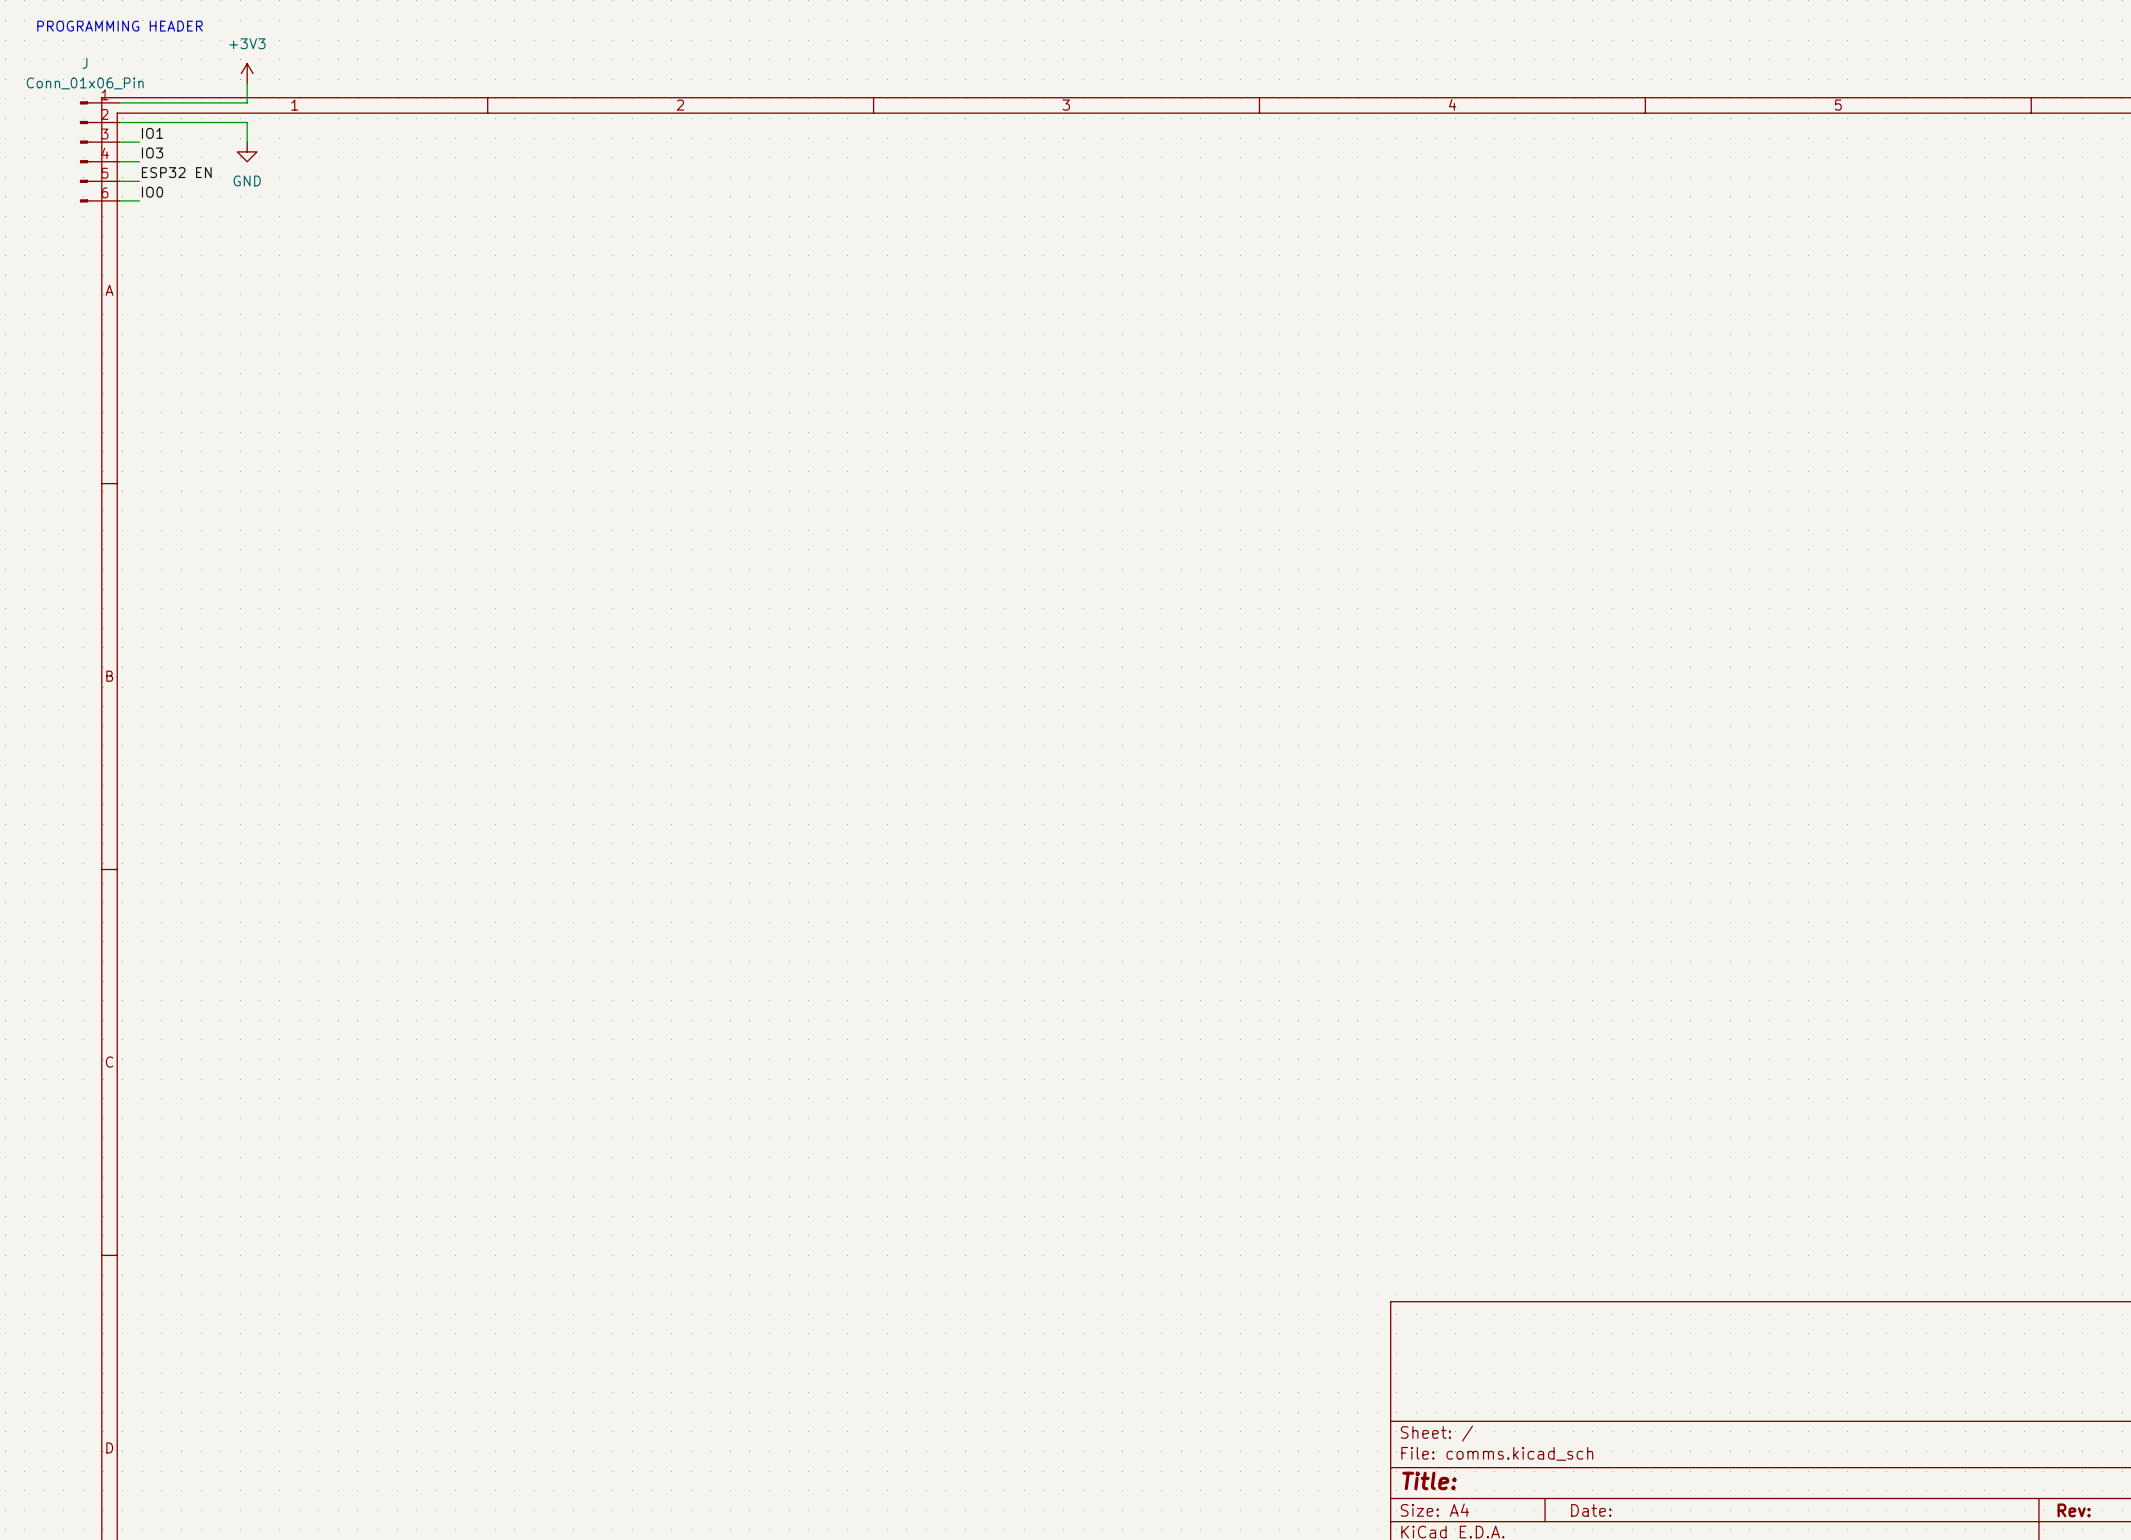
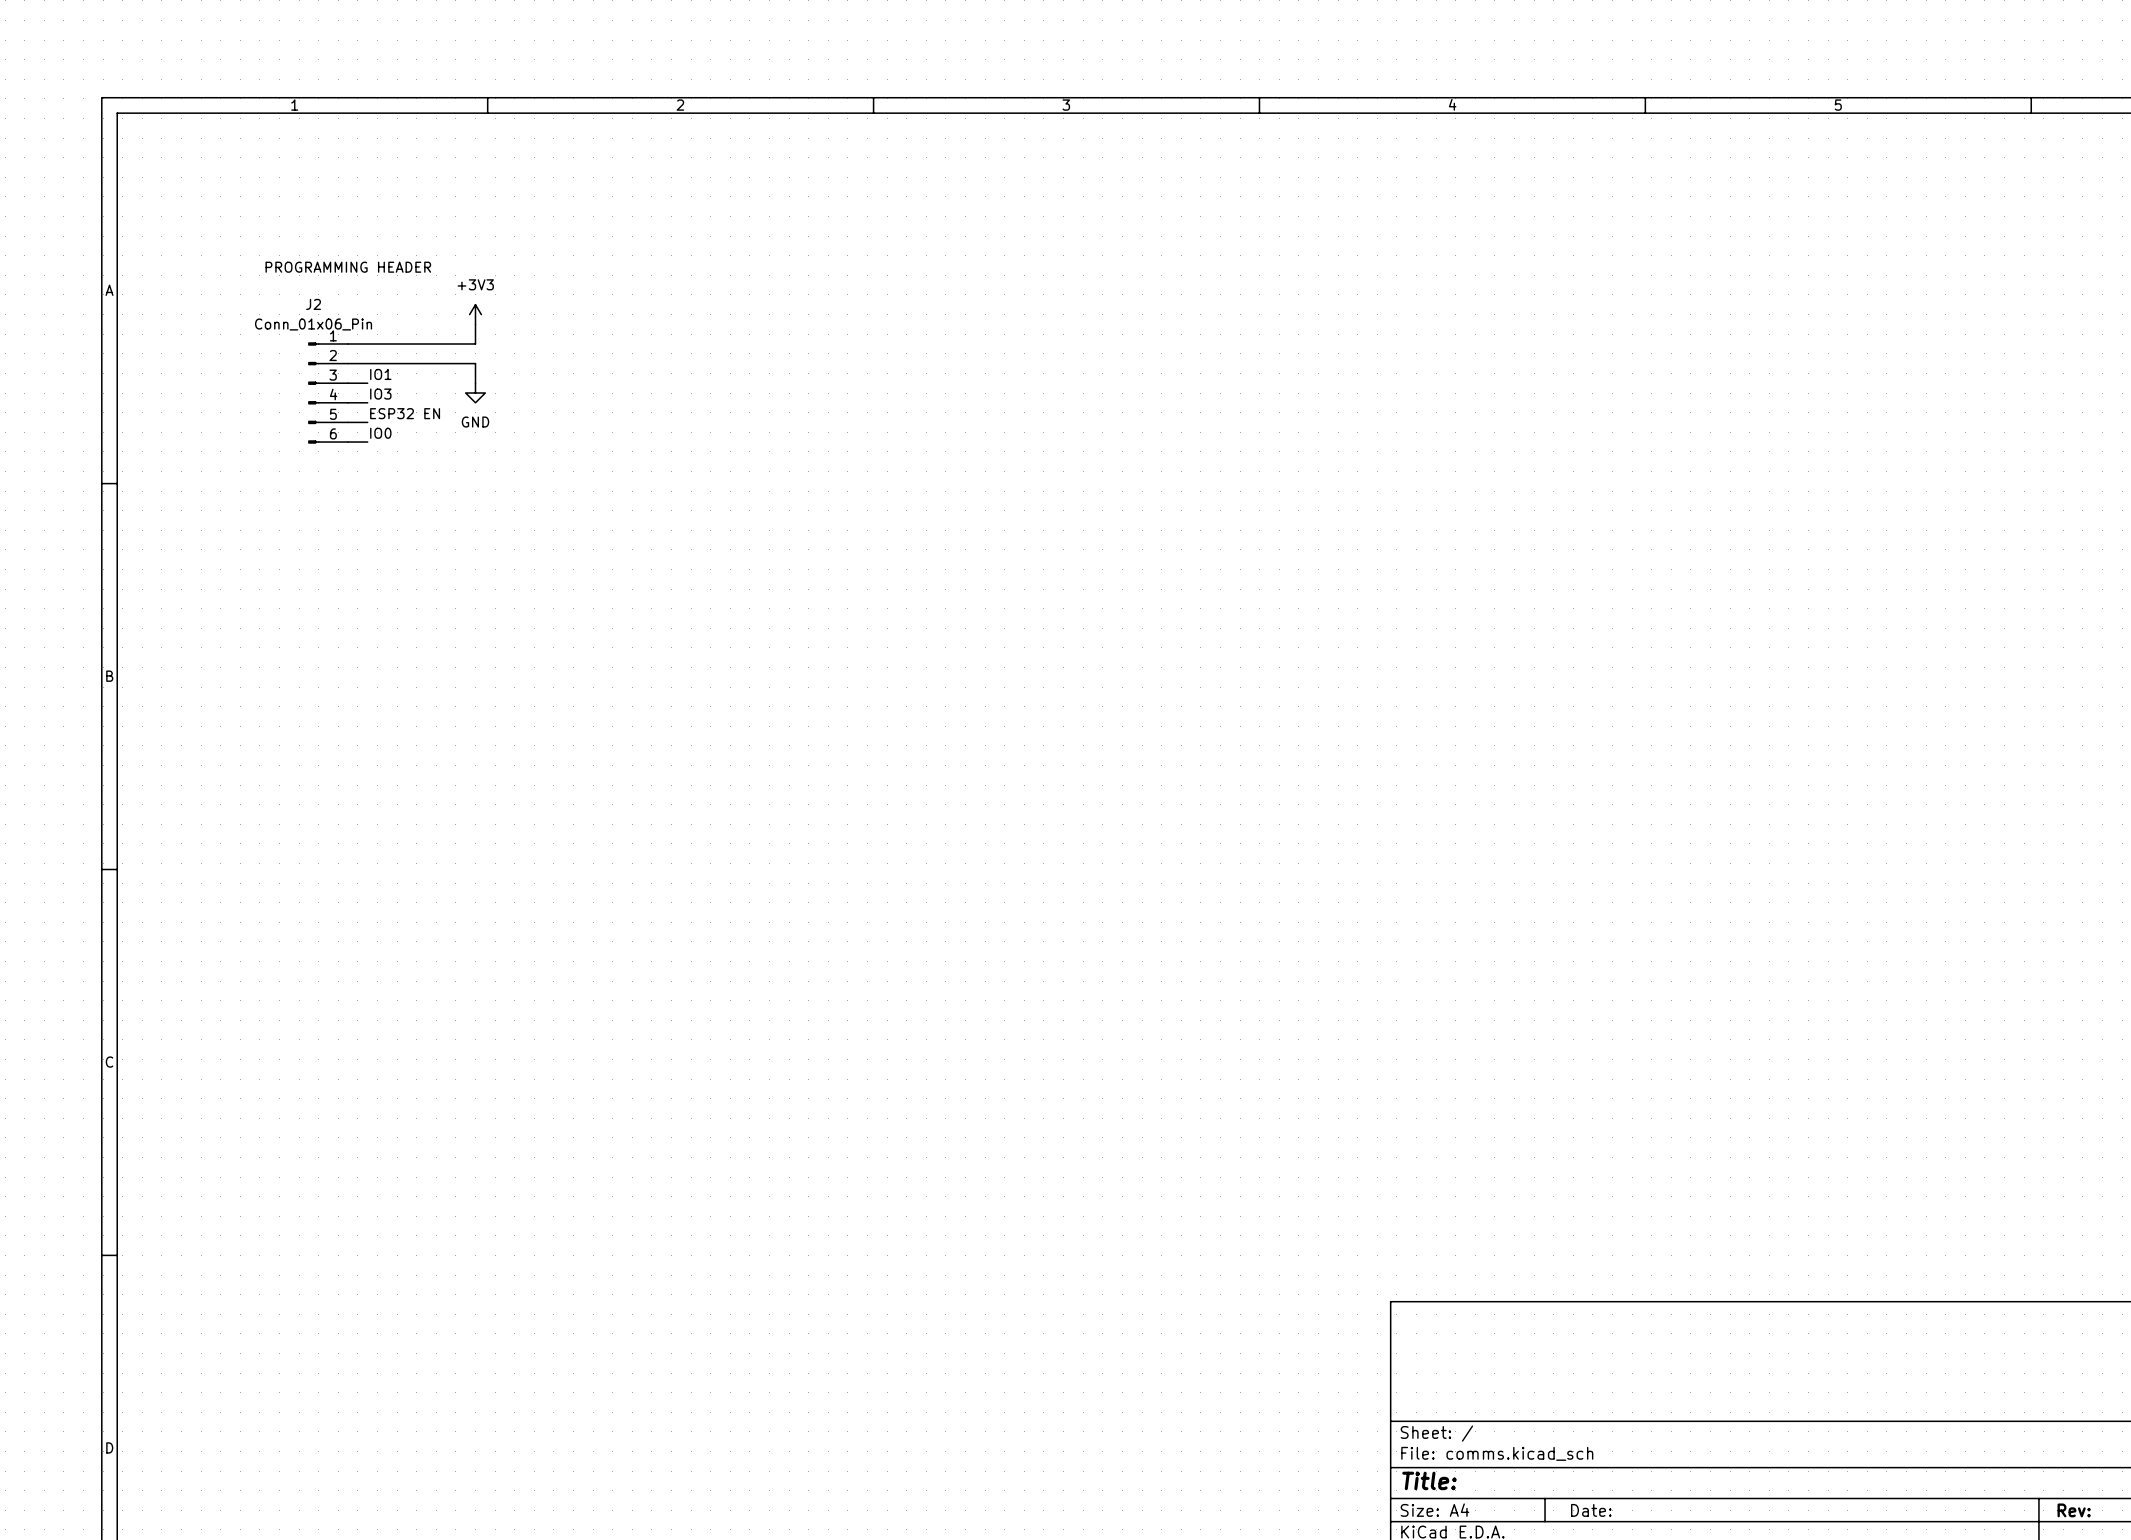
text: PROGRAMMING HEADER (119, 26) -> none
power symbol: +3V3 (247, 73) -> none
wire: (247, 83) (247, 102) (119, 102) -> none
wire: (119, 122) (247, 122) (247, 142) -> none
label: IO1 (152, 133) -> none
wire: (119, 142) (139, 142) -> none
J: Conn_01x06_Pin (99, 151) -> none
power symbol: GND (247, 151) -> none
label: IO3 (152, 152) -> none
wire: (119, 161) (139, 161) -> none
label: ESP32 EN (176, 172) -> none
wire: (119, 181) (139, 181) -> none
label: IO0 (152, 192) -> none
wire: (119, 200) (139, 200) -> none
text: none -> PROGRAMMING HEADER (348, 267)
power symbol: none -> +3V3 (475, 314)
wire: none -> (475, 324) (475, 343) (348, 343)
wire: none -> (348, 363) (475, 363) (475, 383)
label: none -> IO1 (380, 374)
wire: none -> (348, 383) (367, 383)
J2: none -> Conn_01x06_Pin (328, 393)
power symbol: none -> GND (475, 393)
label: none -> IO3 (380, 394)
wire: none -> (348, 402) (367, 402)
label: none -> ESP32 EN (405, 413)
wire: none -> (348, 422) (367, 422)
label: none -> IO0 (380, 433)
wire: none -> (348, 442) (367, 442)

